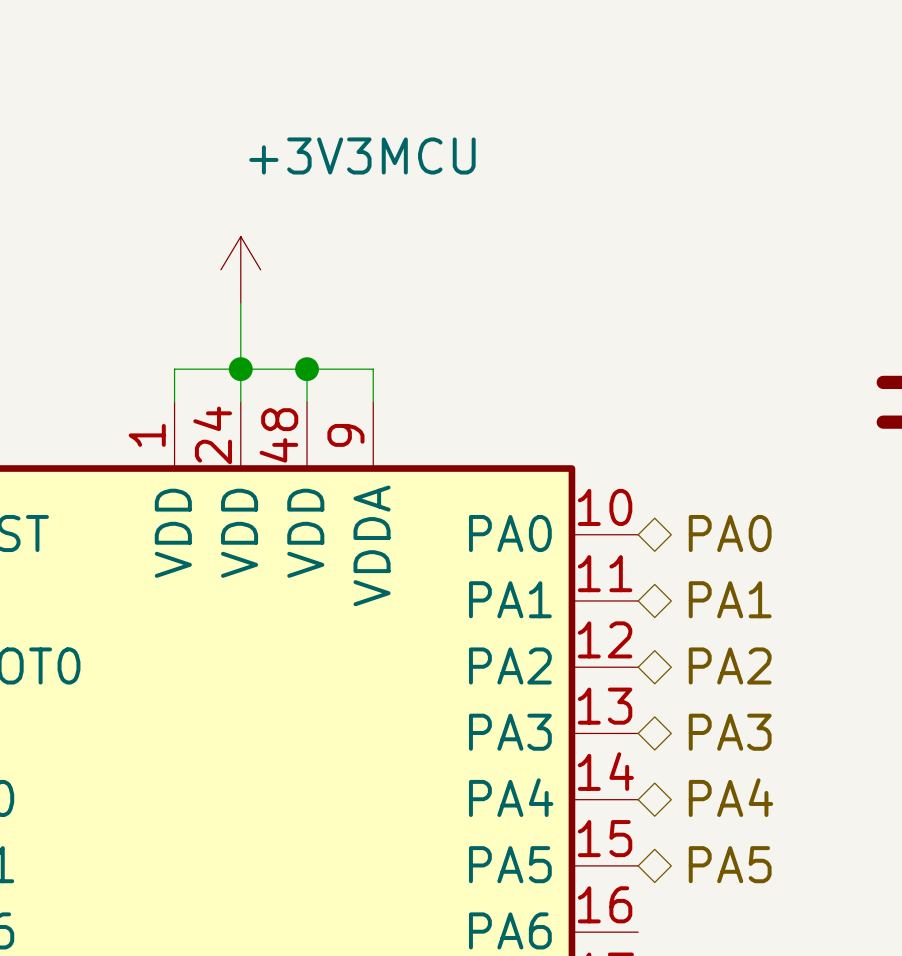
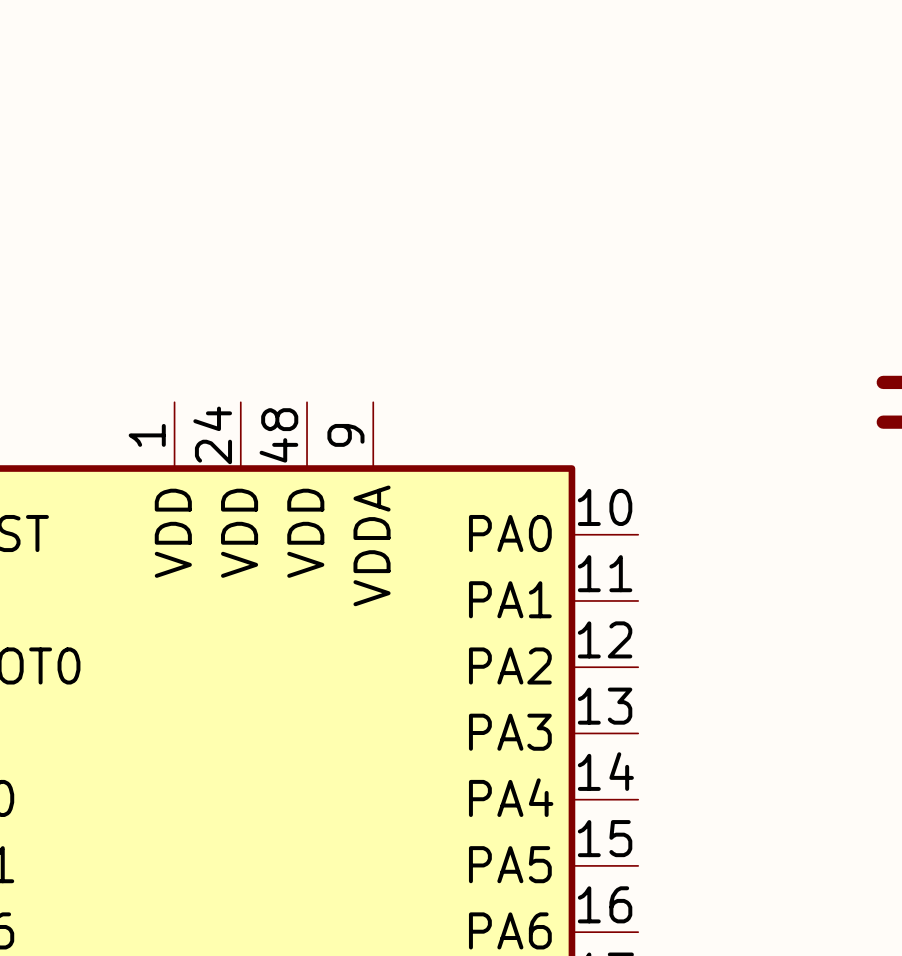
power symbol: +3V3MCU (240, 269) -> none
wire: (240, 302) (240, 402) -> none
junction: (240, 369) -> none
wire: (307, 369) (307, 402) -> none
junction: (307, 369) -> none
wire: (174, 402) (174, 369) (373, 369) (373, 402) -> none
hierarchical label: PA0 (730, 533) -> none
hierarchical label: PA1 (730, 599) -> none
hierarchical label: PA2 (730, 665) -> none
hierarchical label: PA3 (730, 732) -> none
hierarchical label: PA4 (730, 797) -> none
hierarchical label: PA5 (730, 864) -> none

